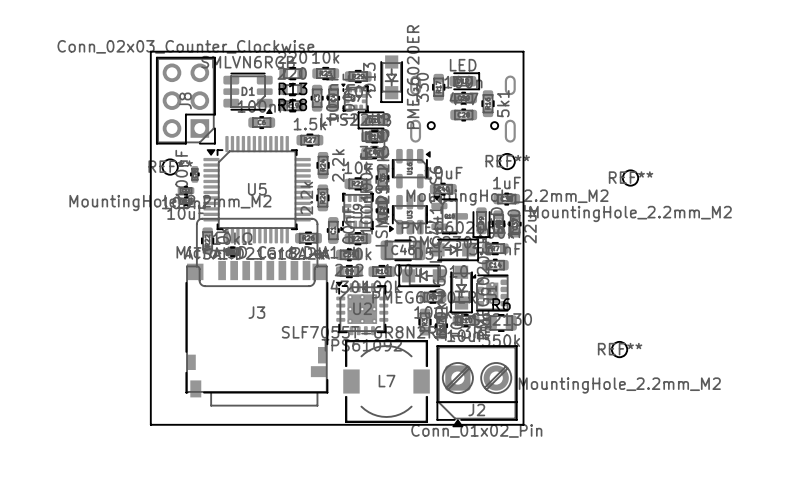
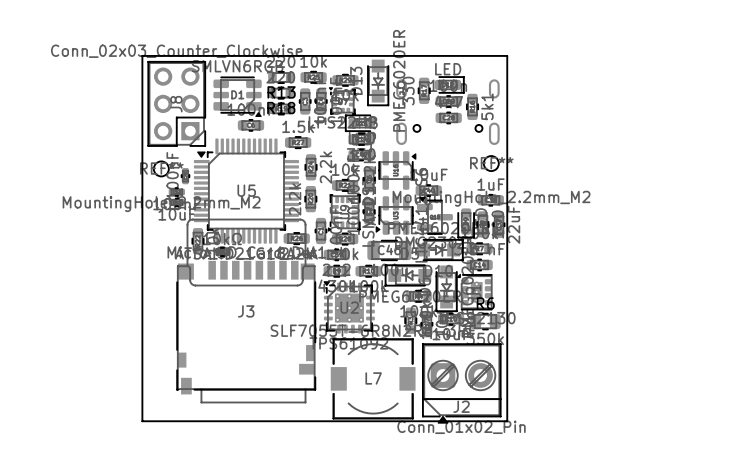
REF**: MountingHole_2.2mm_M2 (630, 178) -> none
REF**: MountingHole_2.2mm_M2 (619, 349) -> none

